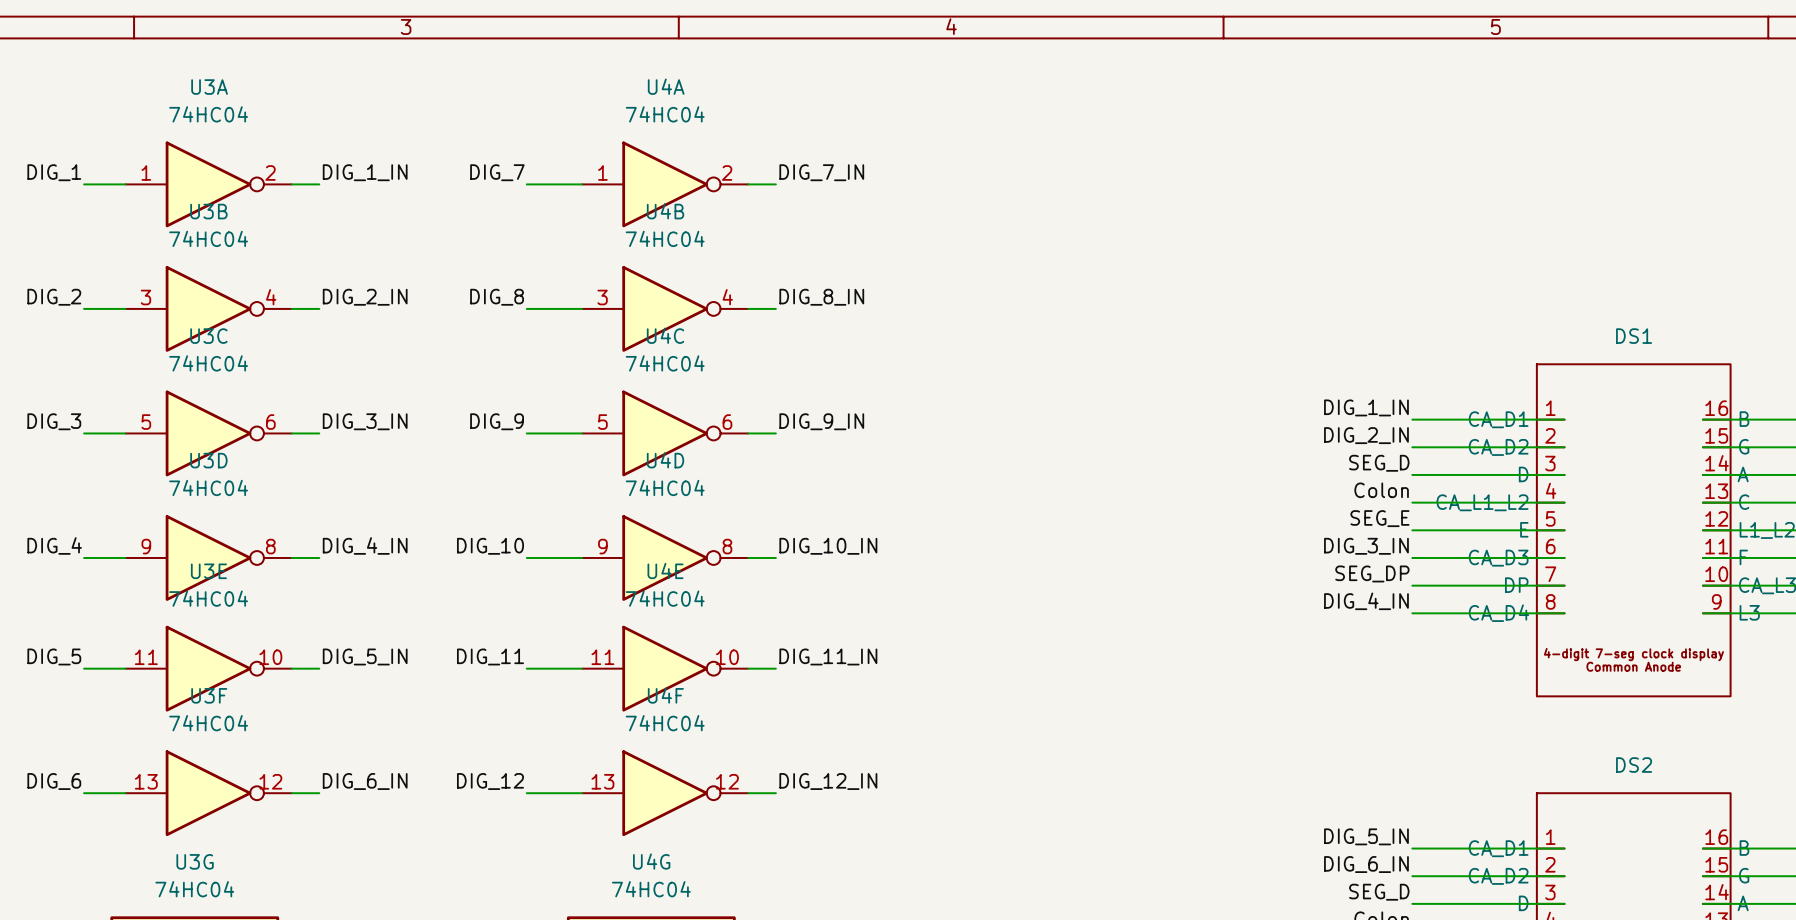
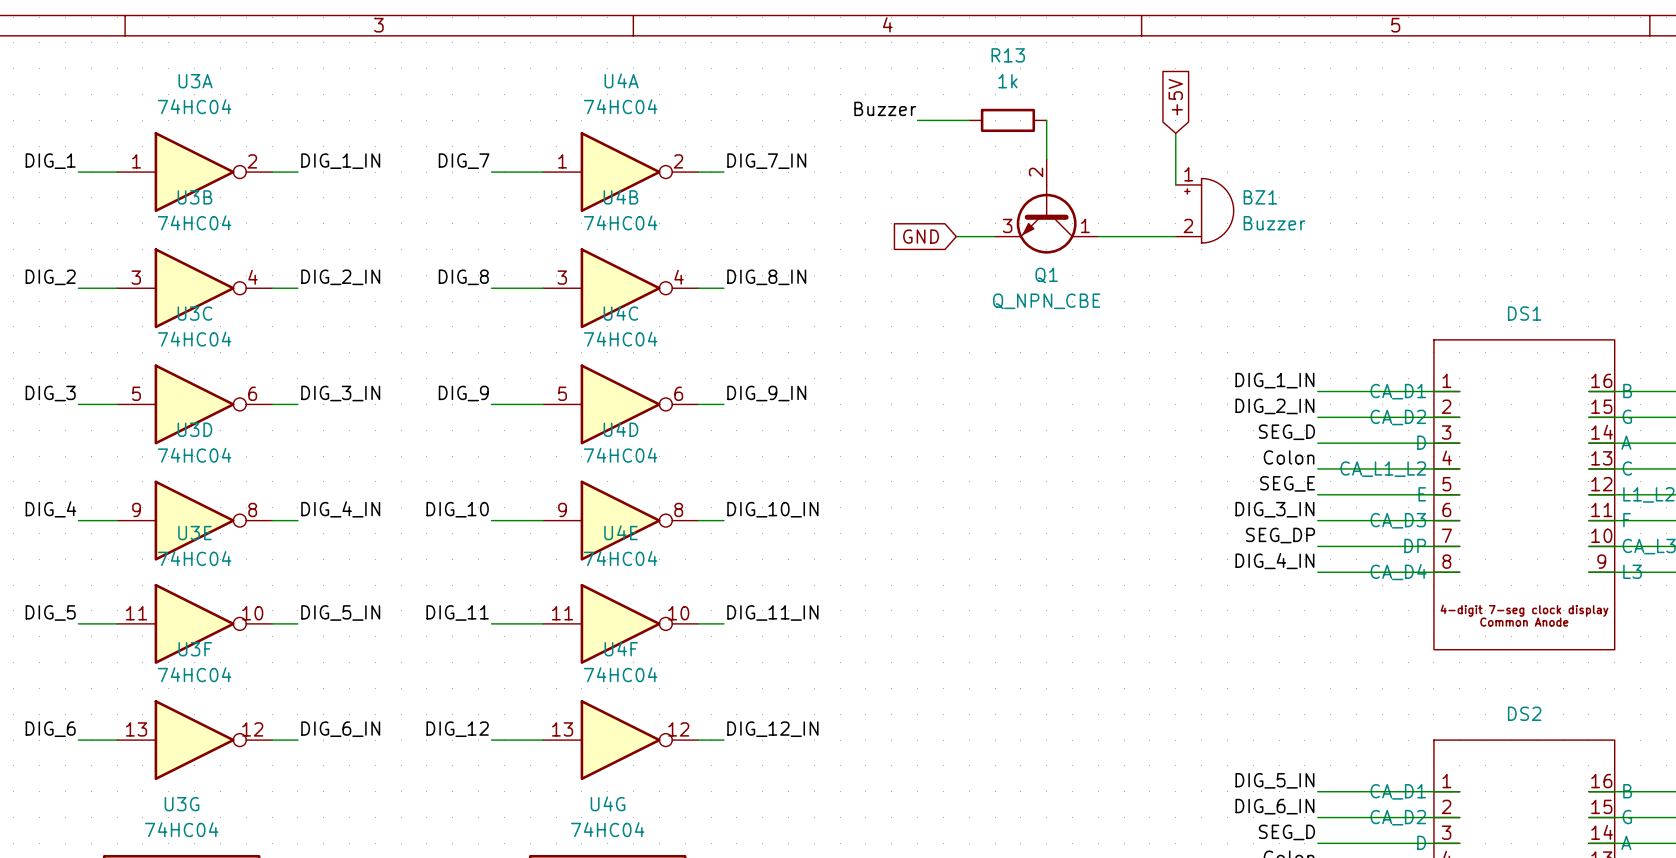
global label: none -> +5V (1175, 97)
label: none -> Buzzer (885, 108)
wire: none -> (917, 120) (969, 120)
R13: none -> 1k (1007, 120)
wire: none -> (1046, 120) (1046, 159)
wire: none -> (1175, 133) (1175, 184)
Q1: none -> Q_NPN_CBE (1046, 206)
BZ1: none -> Buzzer (1204, 210)
global label: none -> GND (921, 236)
wire: none -> (956, 236) (995, 236)
wire: none -> (1098, 236) (1175, 236)

